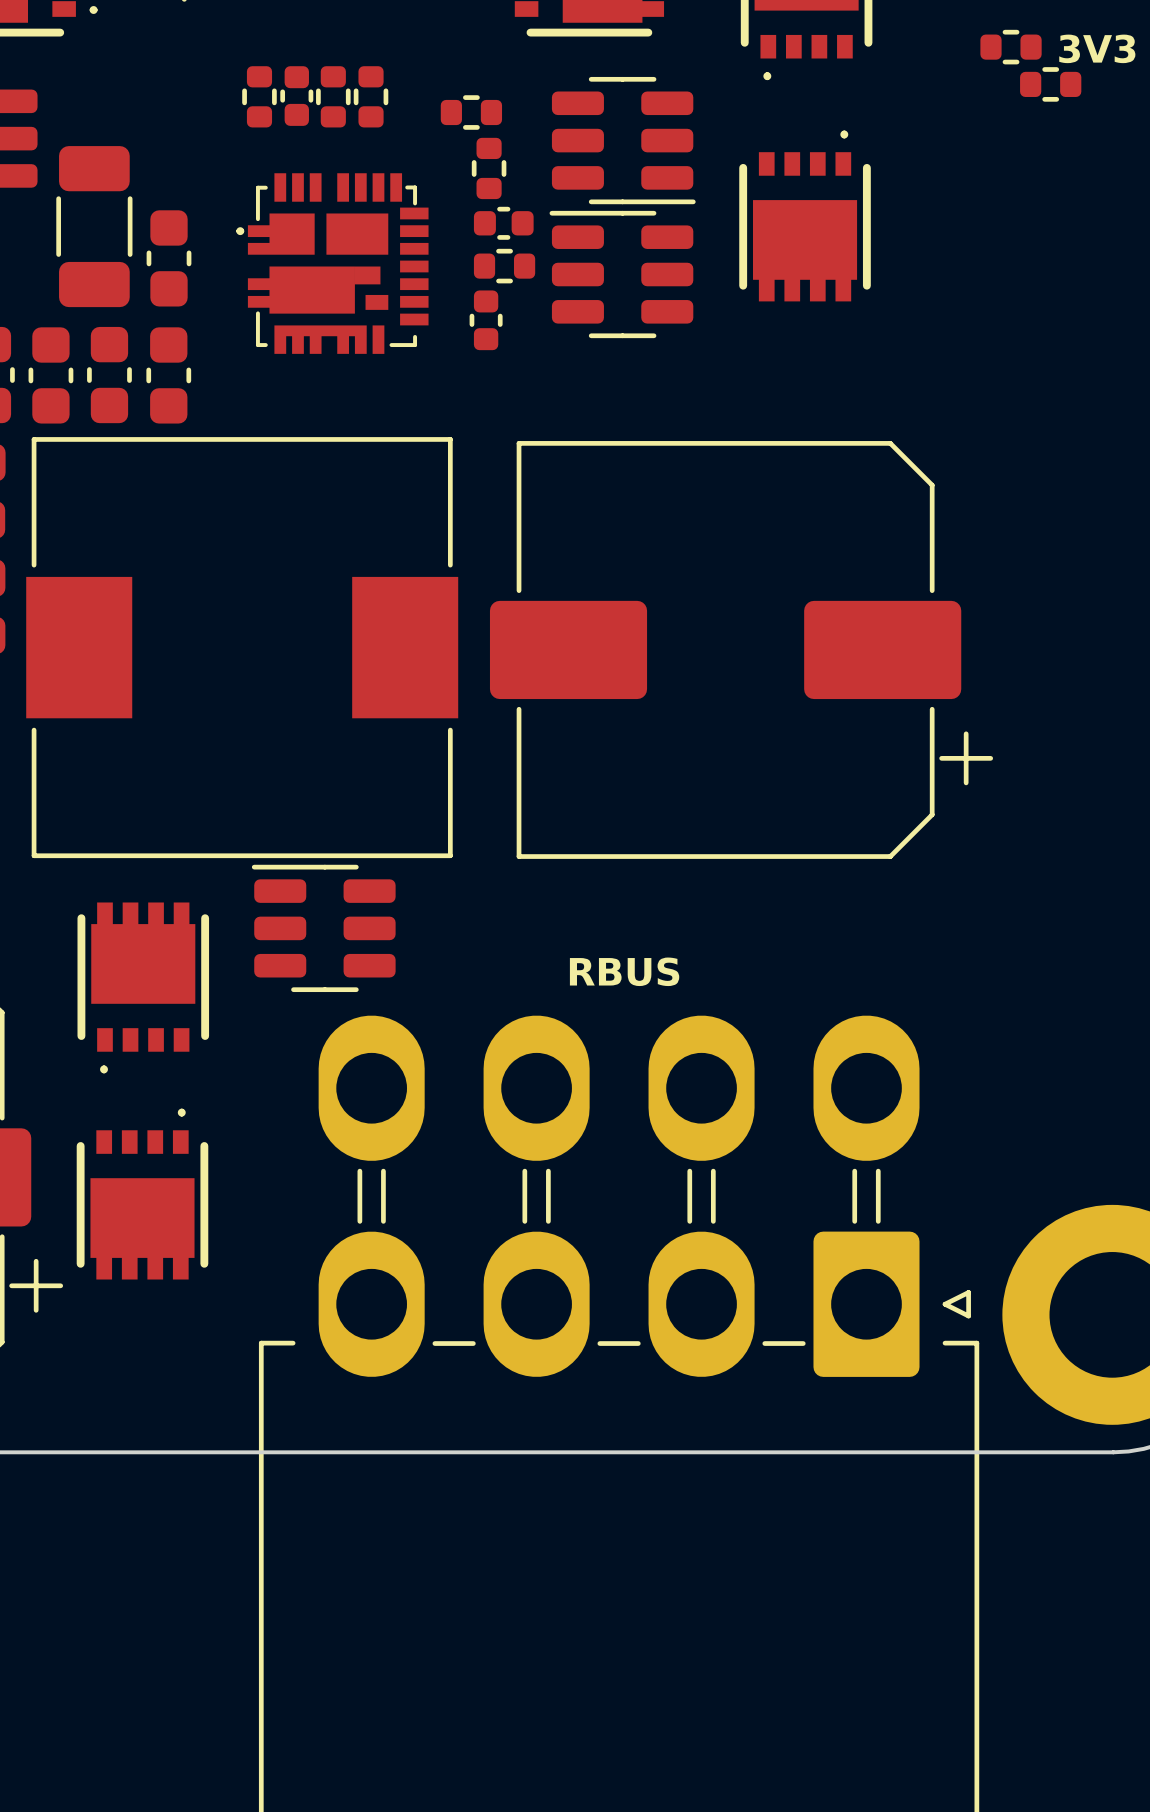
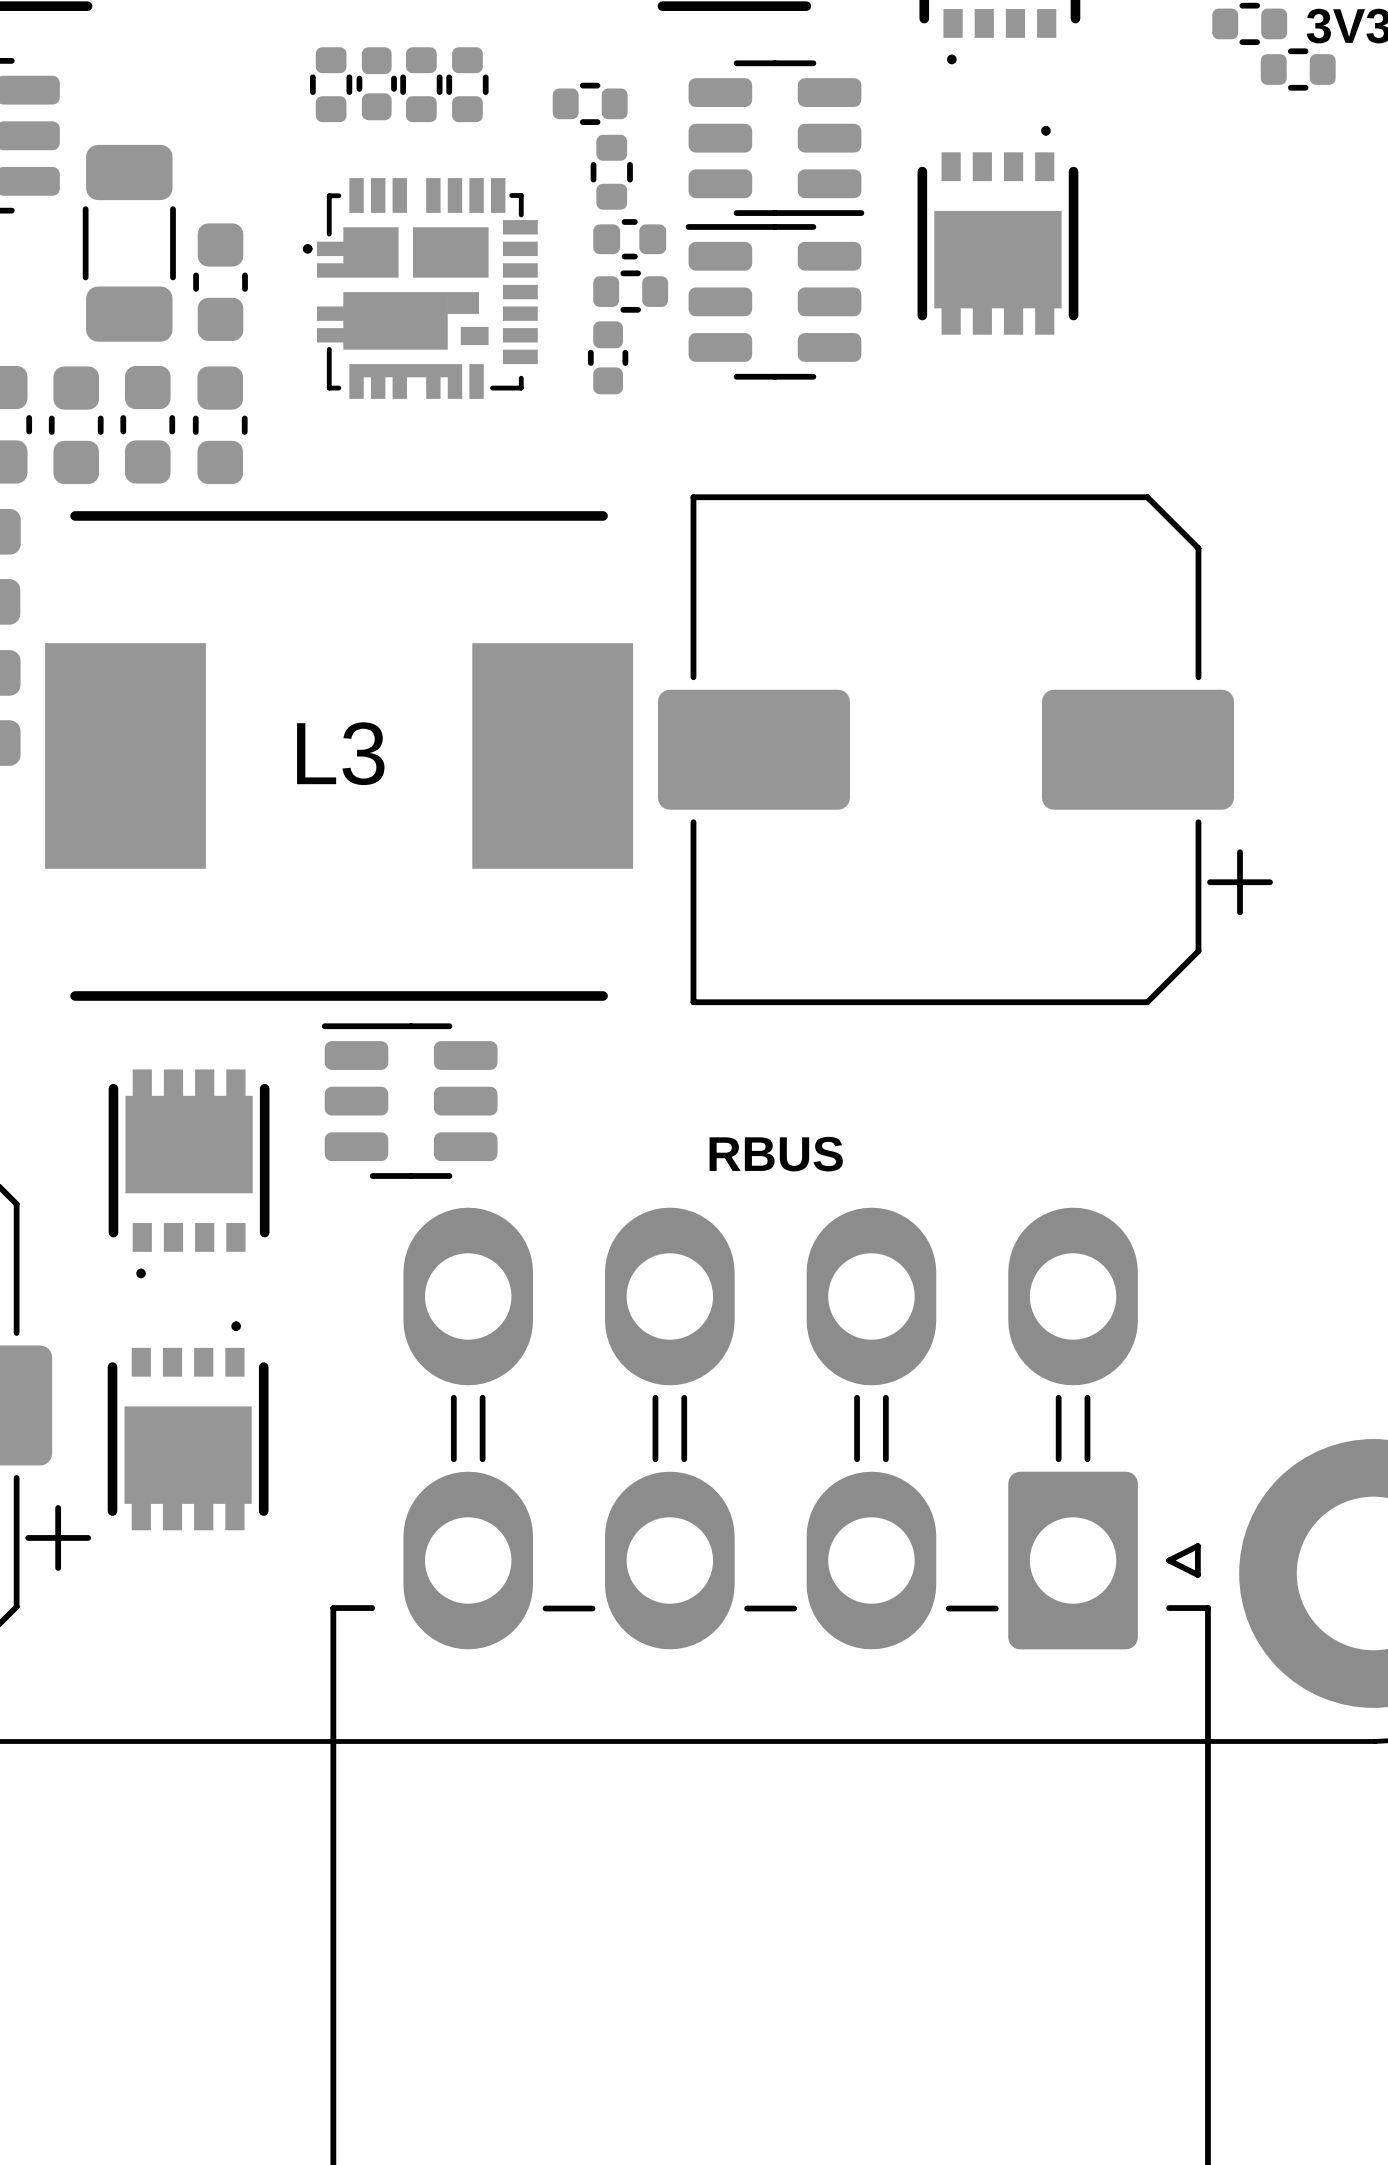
L3: none -> (339, 755)
part: (242, 647) -> none
part position: (741, 649) -> (965, 749)

